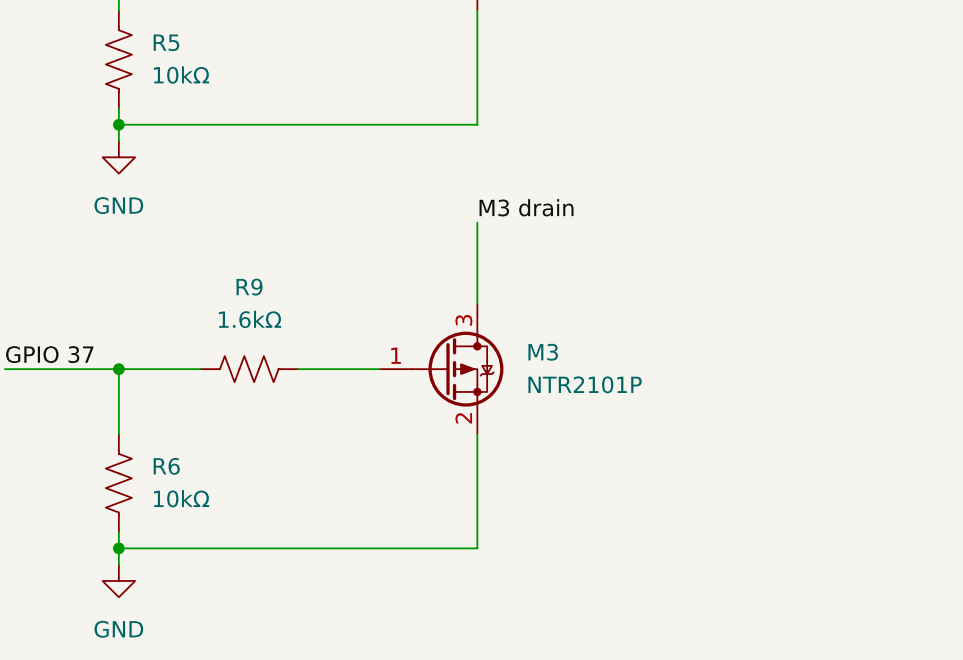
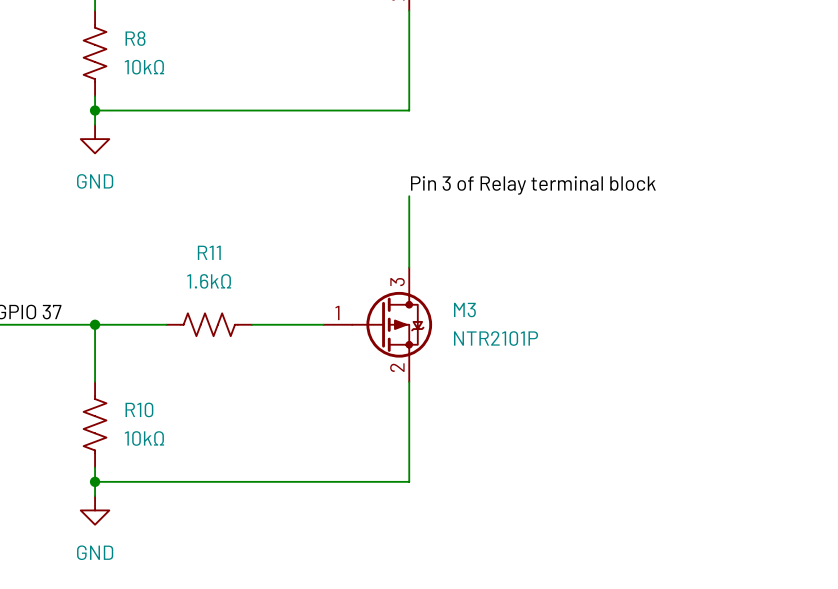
R5 name: R5 (166, 42) -> R8 (135, 38)
label: M3 drain (526, 207) -> Pin 3 of Relay terminal block (533, 185)
R9 name: R9 (249, 287) -> R11 (209, 252)
R6 name: R6 (166, 466) -> R10 (139, 409)

